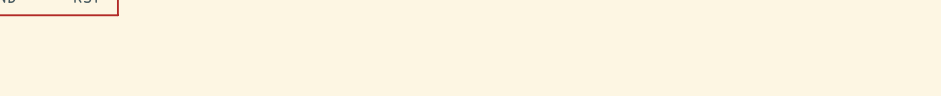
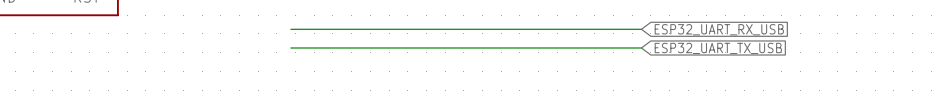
wire: none -> (290, 29) (641, 29)
global label: none -> ESP32_UART_RX_USB (719, 29)
wire: none -> (290, 47) (641, 47)
global label: none -> ESP32_UART_TX_USB (718, 48)

